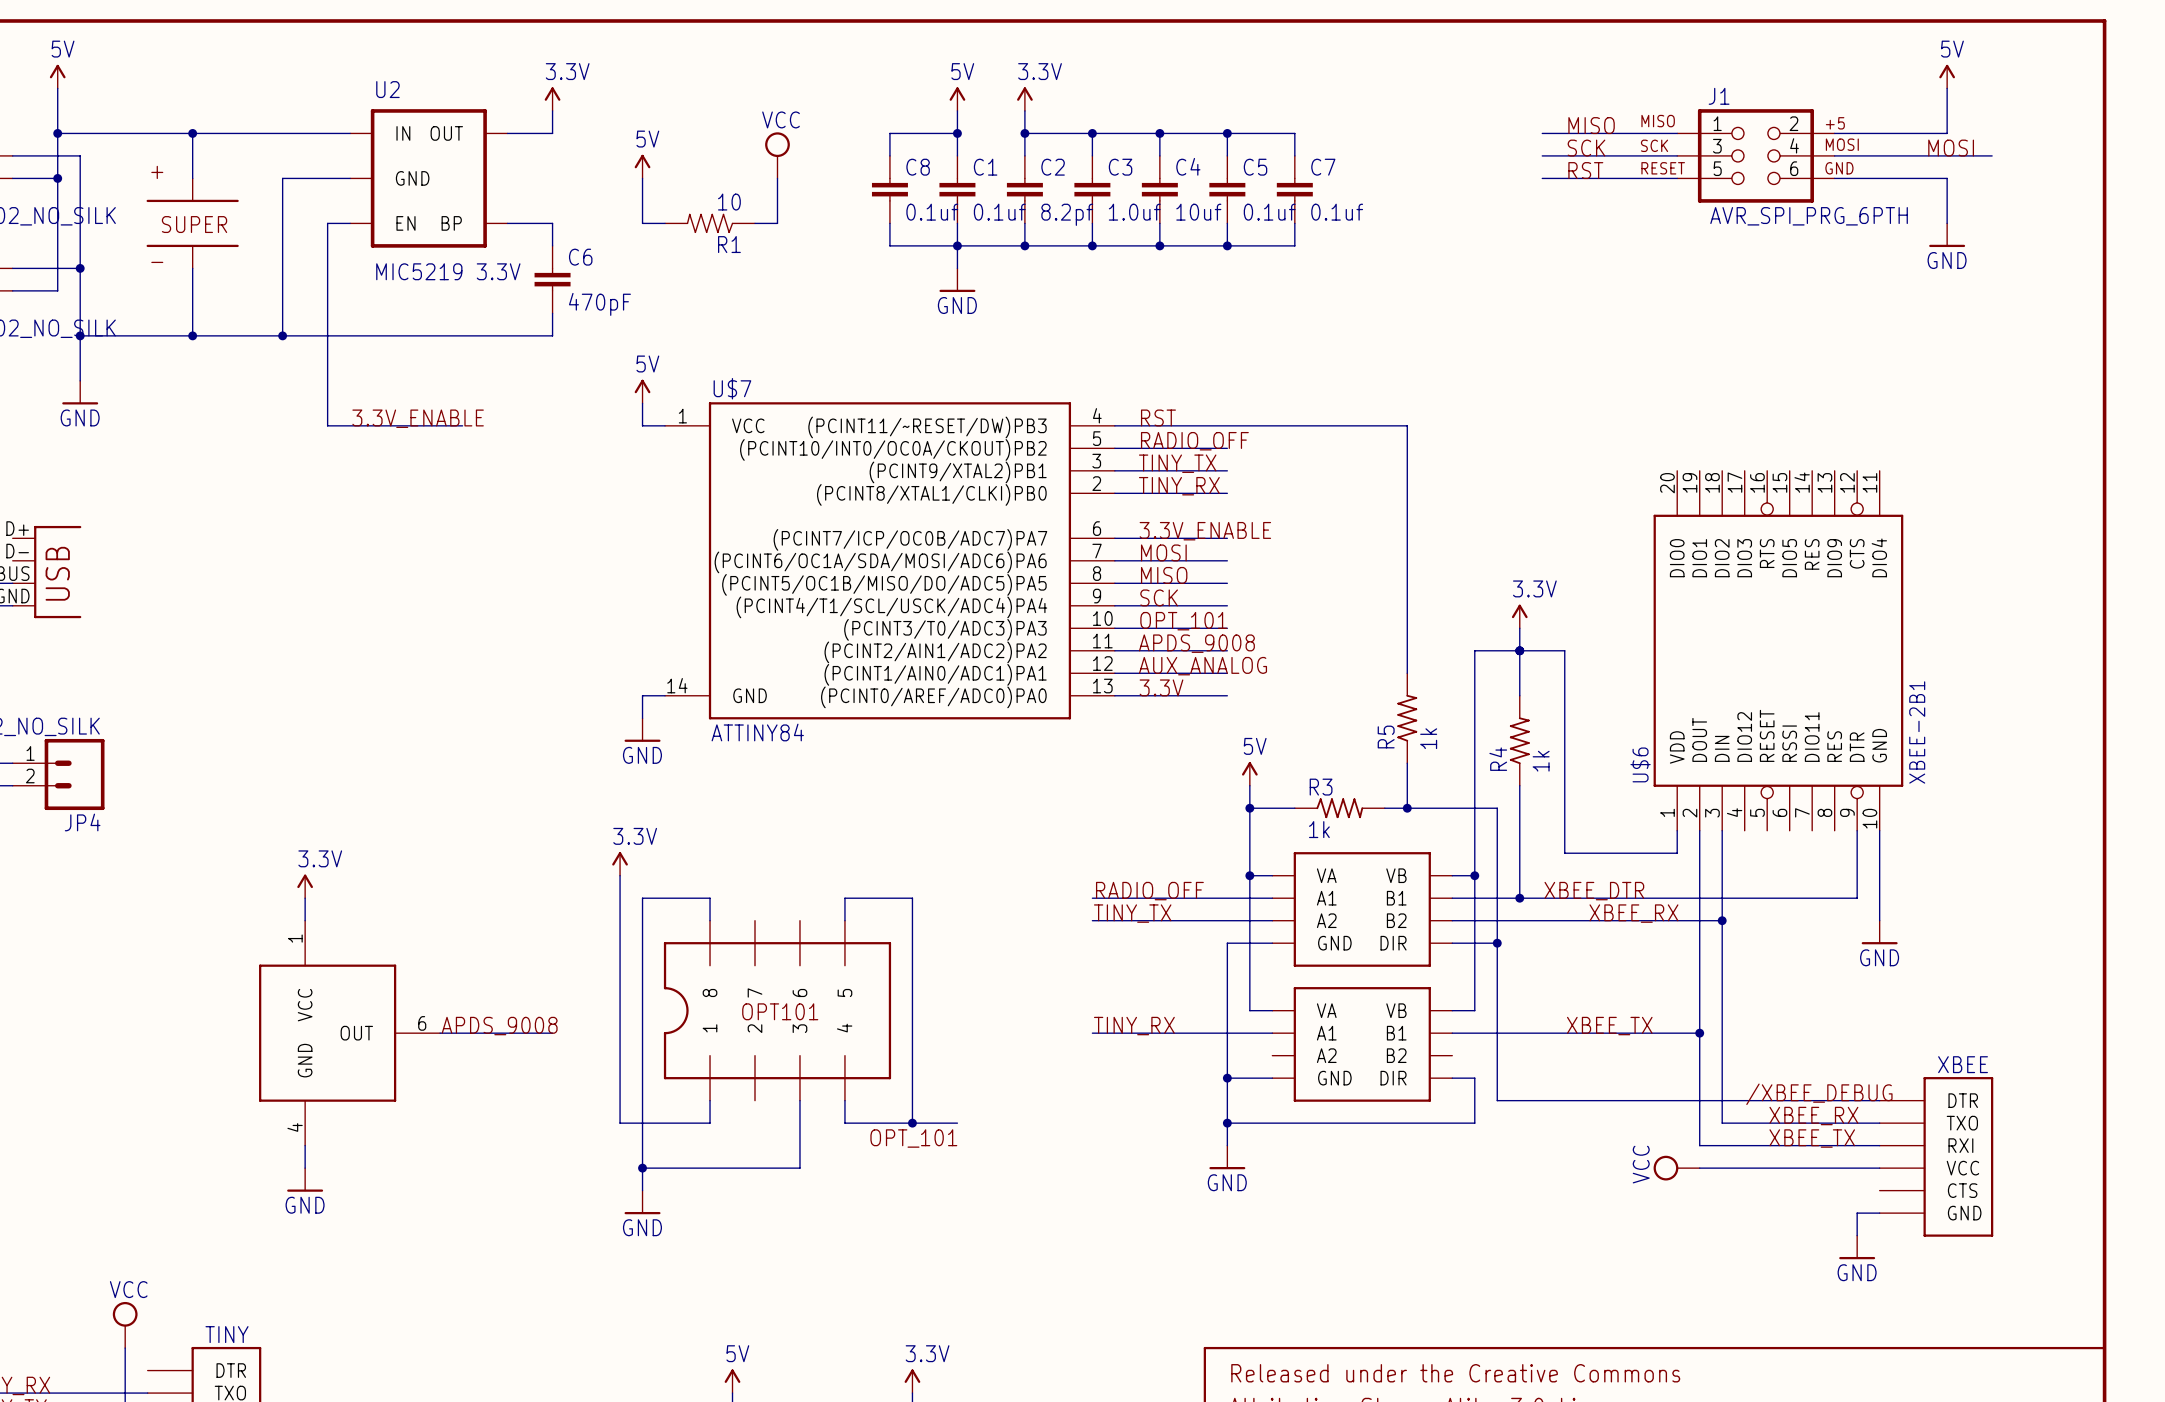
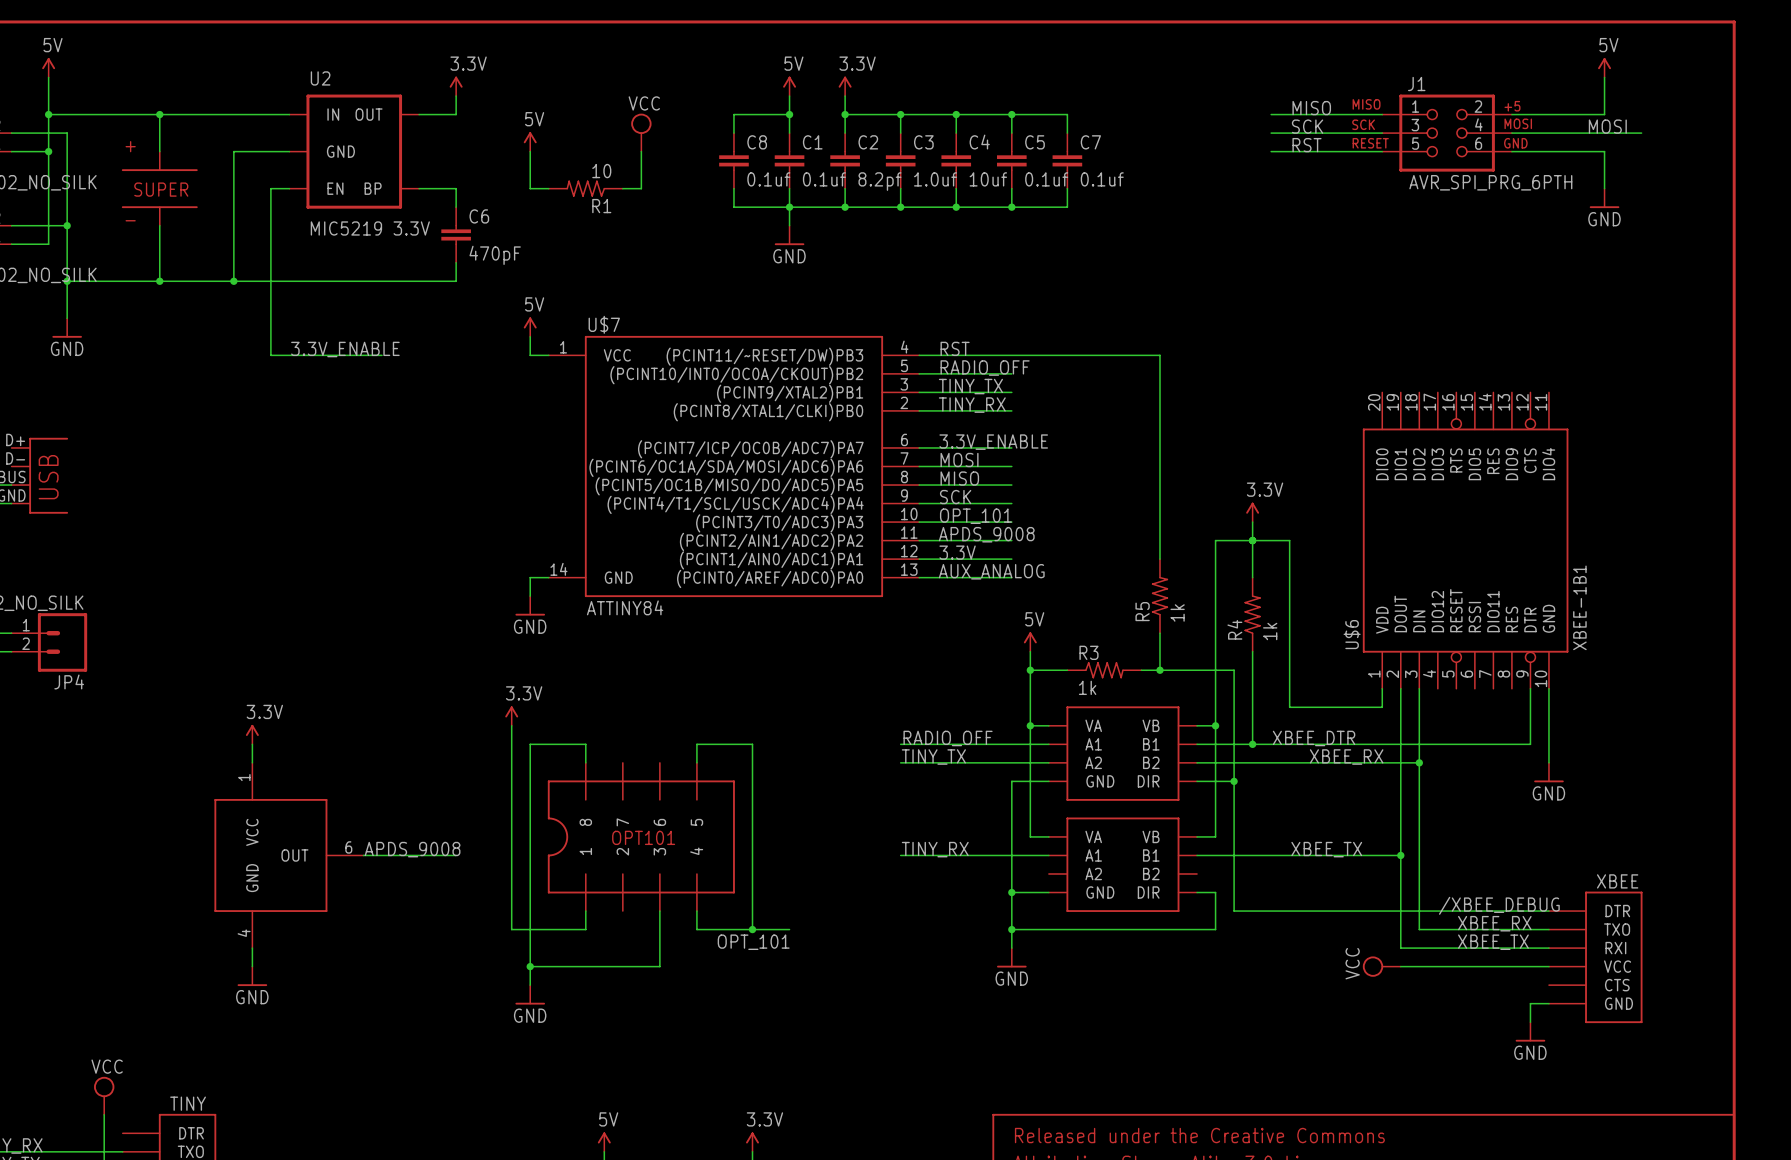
label: AUX_ANALOG (1202, 666) -> 3.3V (957, 552)
label: 3.3V (1161, 687) -> AUX_ANALOG (991, 571)
U$6 value: XBEE-2B1 (1917, 732) -> XBEE-1B1 (1579, 607)

